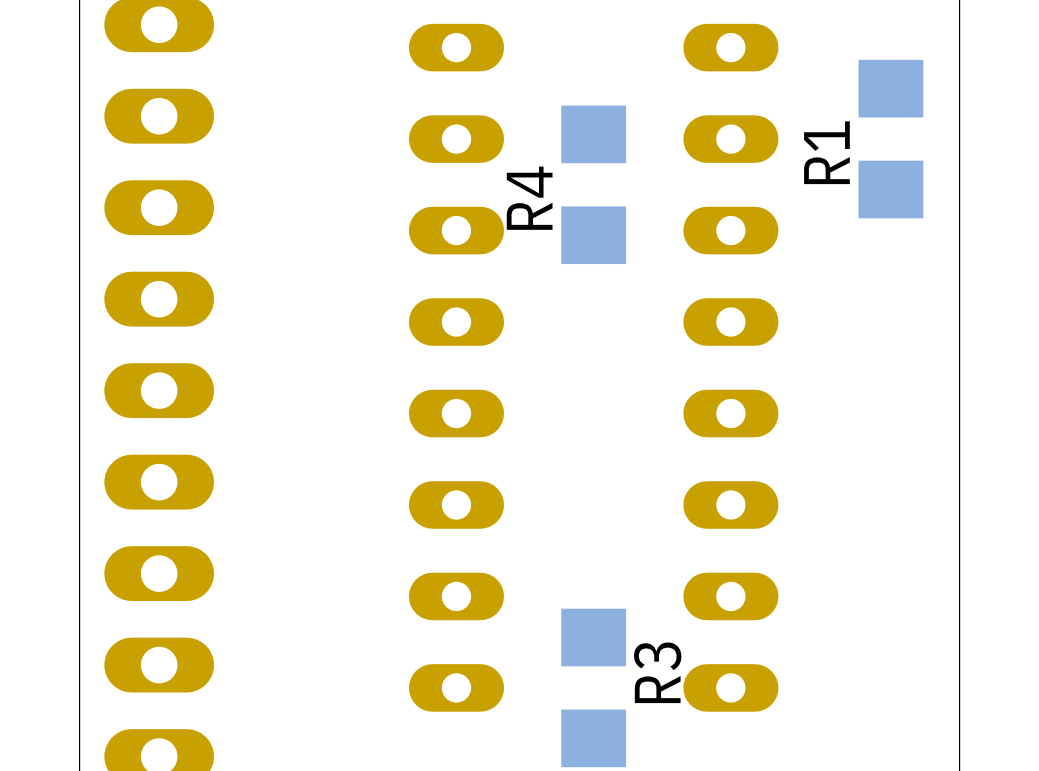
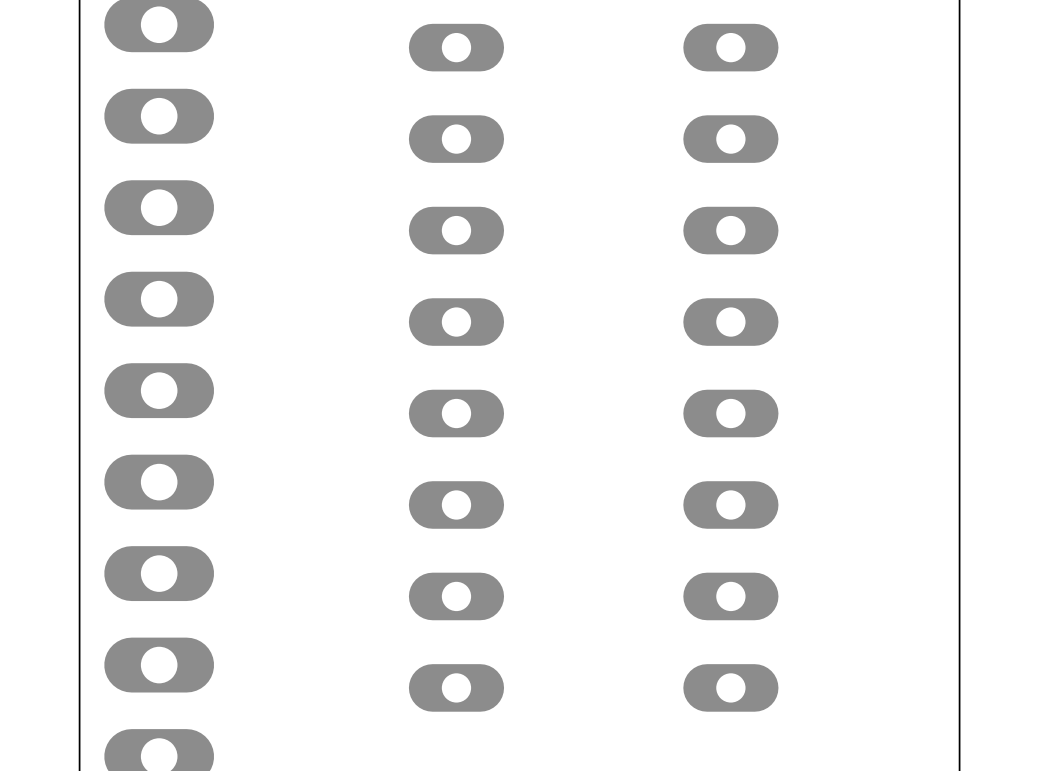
R1: (890, 139) -> none
R4: (593, 184) -> none
R3: (593, 687) -> none

